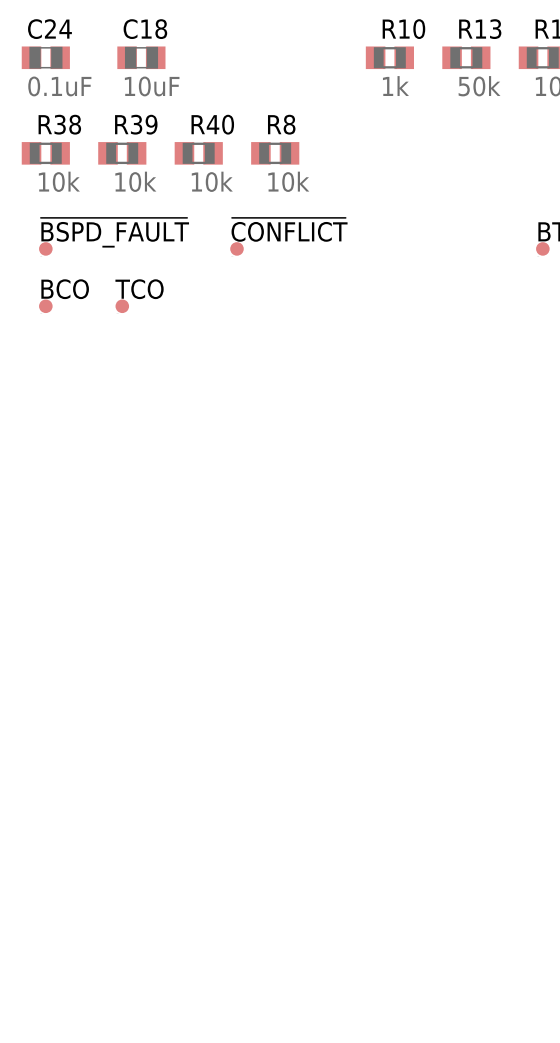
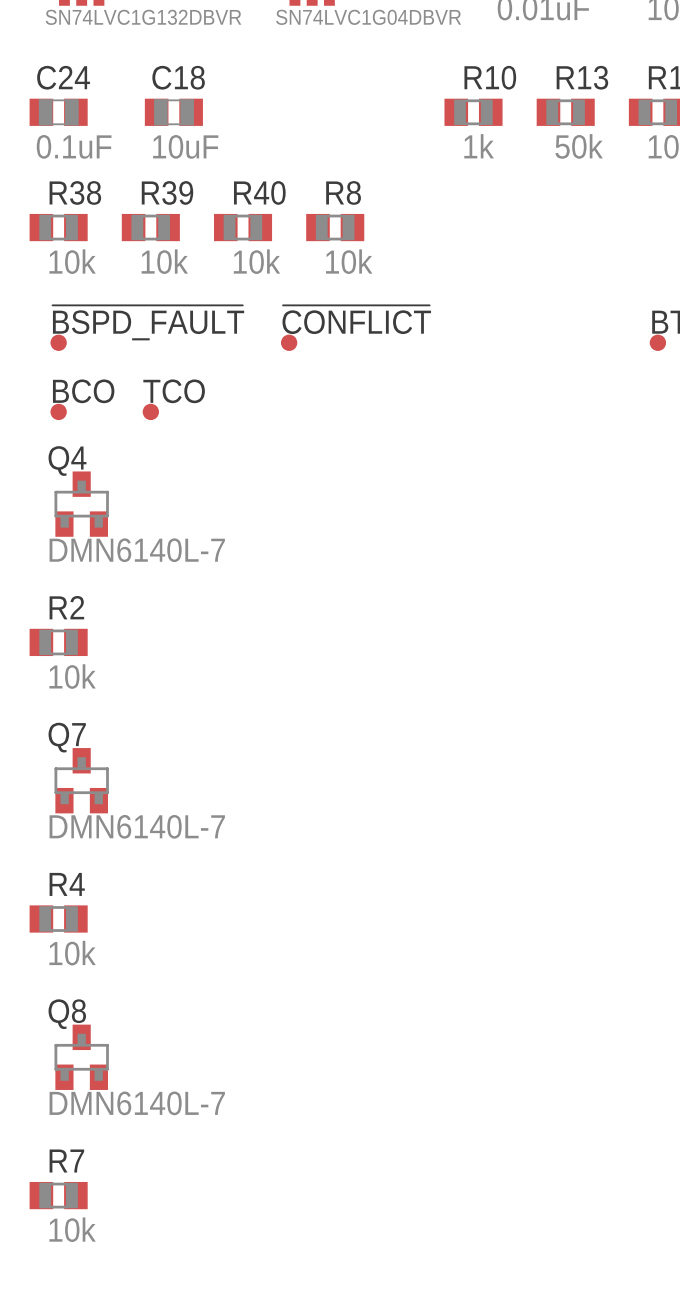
Q4: none -> DMN6140L-7 (81, 504)
R2: none -> 10k (58, 642)
Q7: none -> DMN6140L-7 (81, 780)
R4: none -> 10k (58, 919)
Q8: none -> DMN6140L-7 (81, 1057)
R7: none -> 10k (58, 1195)

